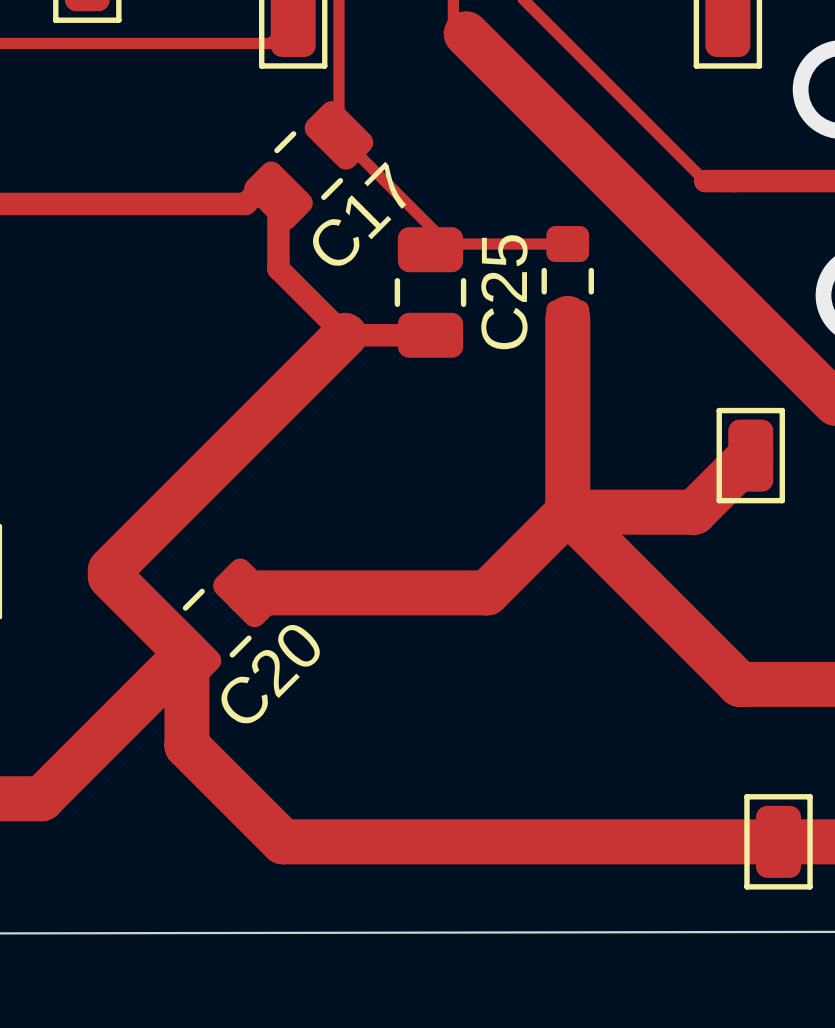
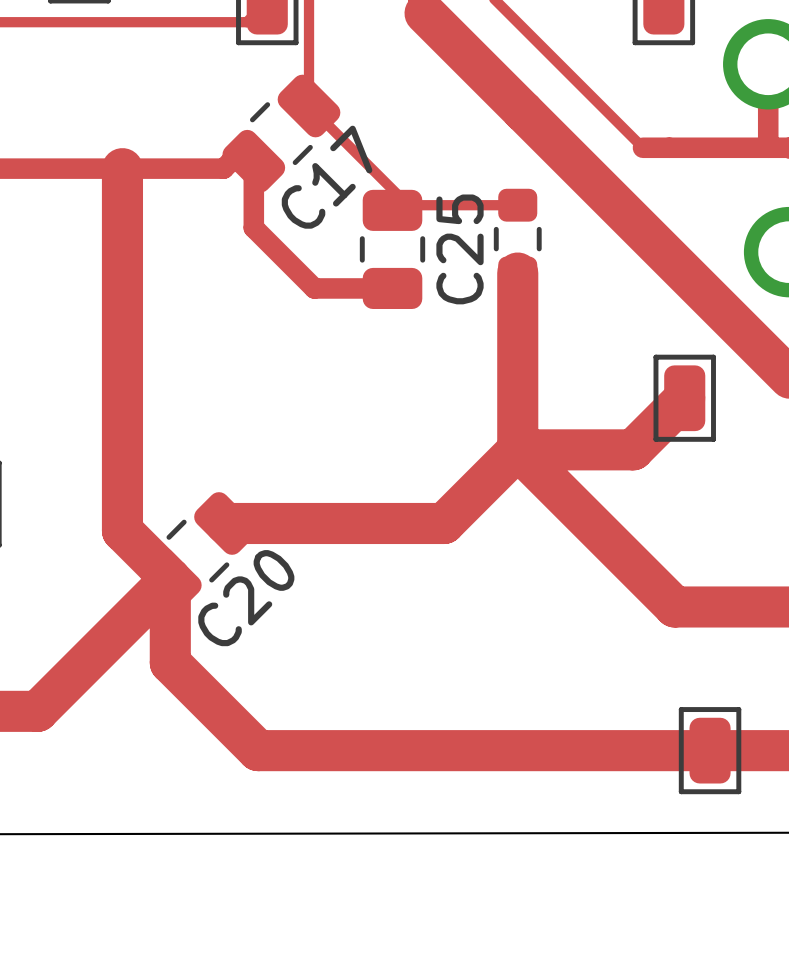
track: (344, 335) (110, 570) (110, 576) (134, 600) -> (122, 168) (122, 530)

